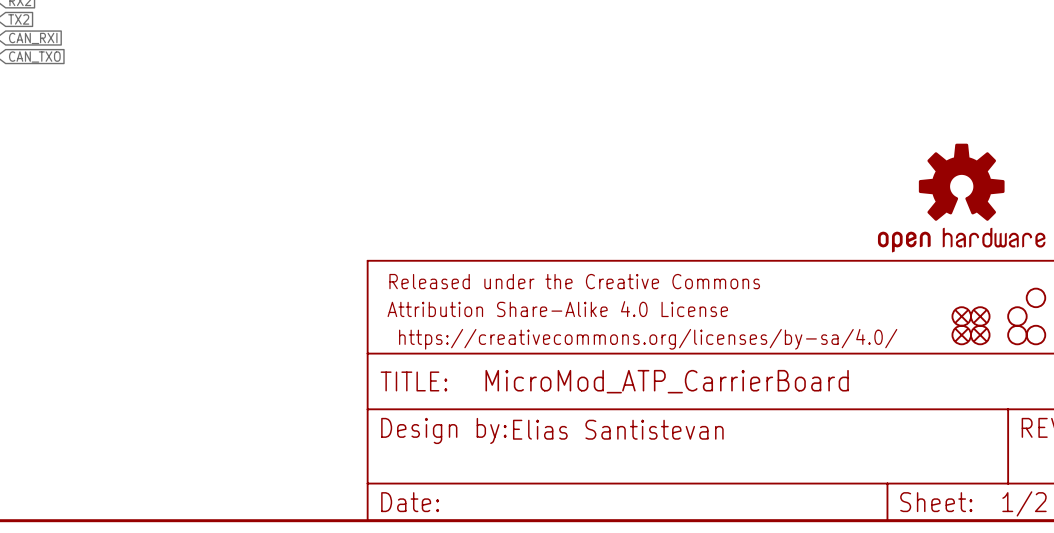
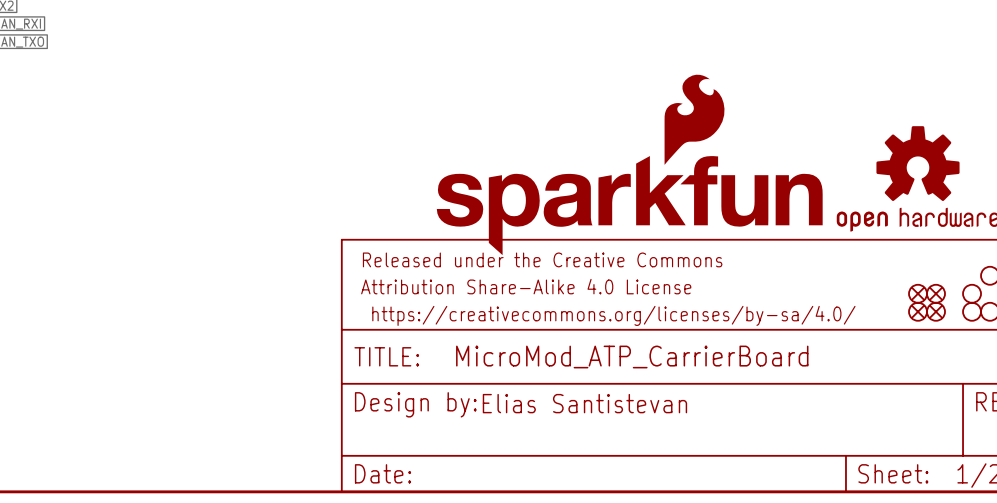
part: none -> (629, 164)

